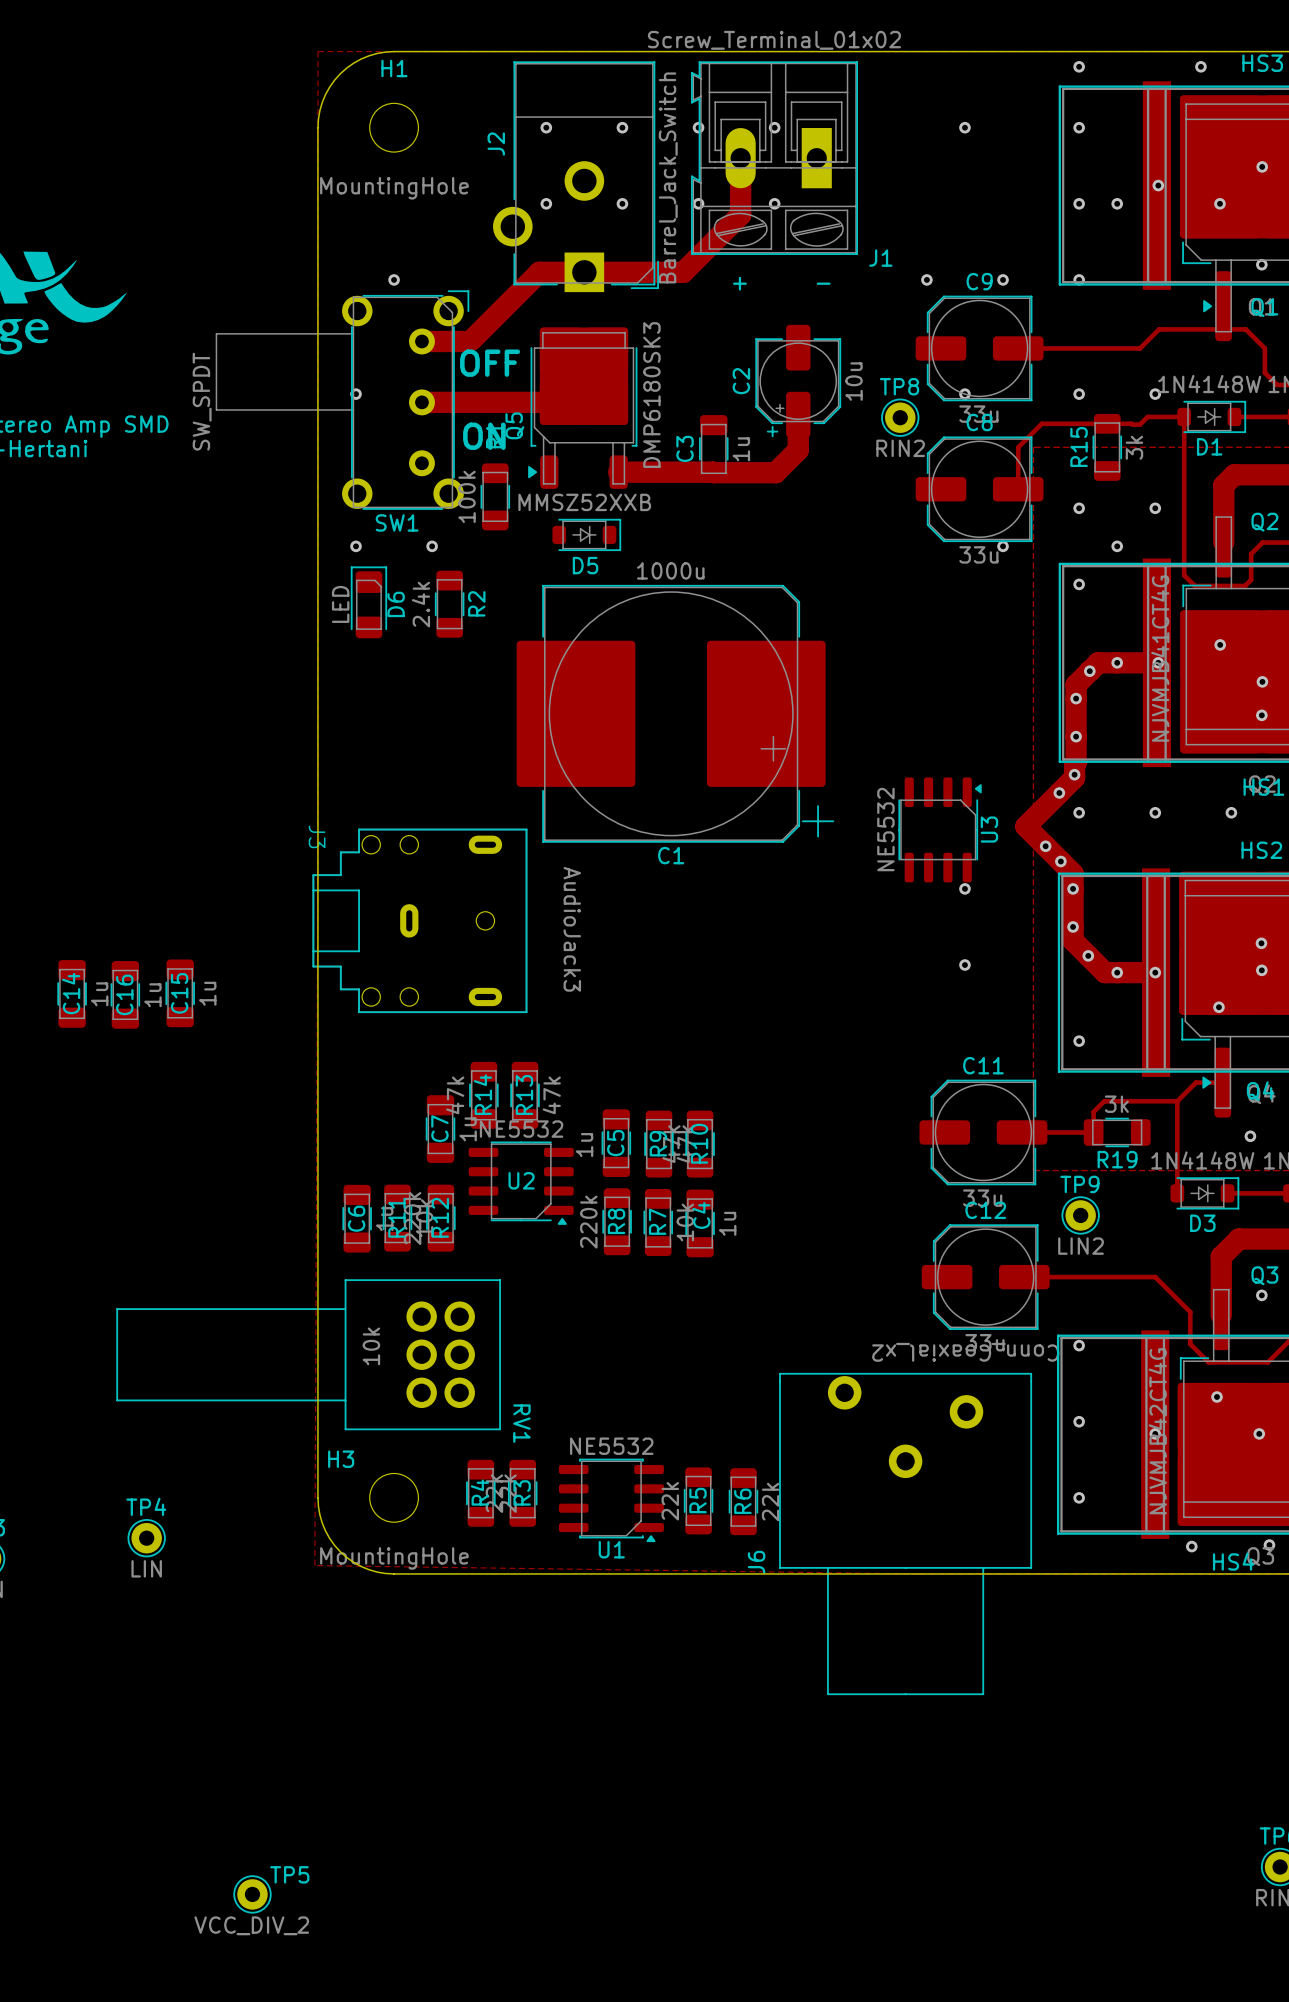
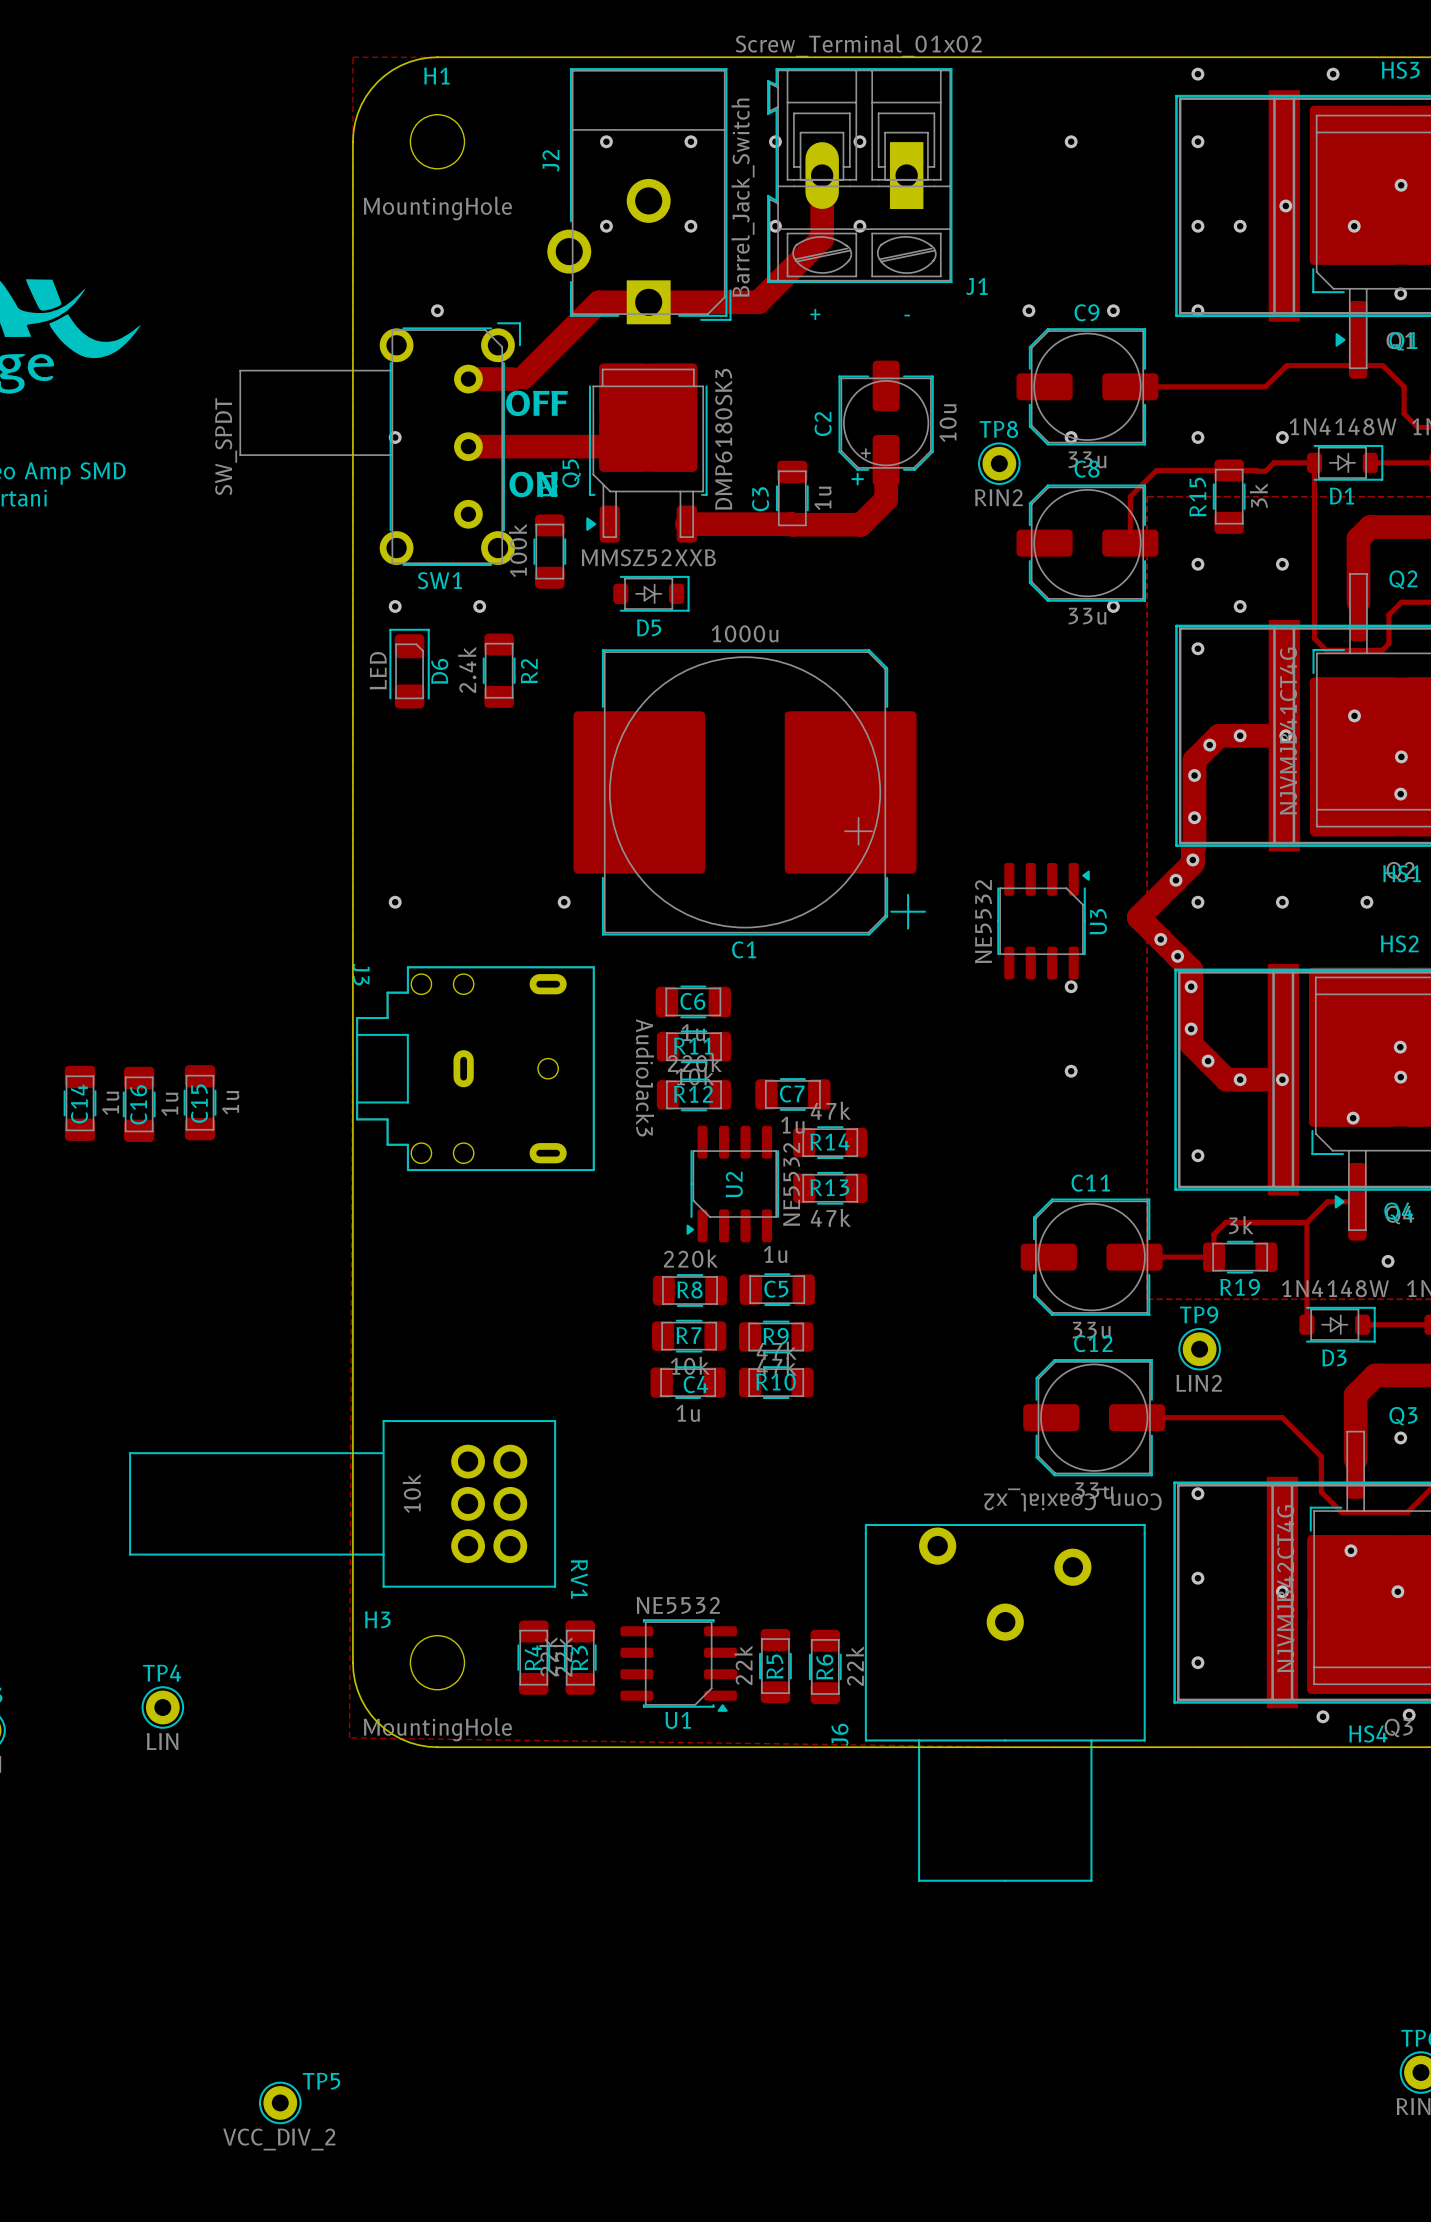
via: none -> (395, 902)
via: none -> (564, 902)
J3 position: (419, 920) -> (475, 1068)
R14 rotation: 0° (483, 1095) -> 90° clockwise (830, 1142)
R14 position: (483, 1095) -> (830, 1142)
R13 rotation: 0° (524, 1095) -> 90° clockwise (830, 1188)
R13 position: (524, 1095) -> (830, 1188)
C7 rotation: 0° (440, 1129) -> 90° clockwise (792, 1094)
C7 position: (440, 1129) -> (792, 1094)
C5 rotation: 0° (616, 1143) -> 90° clockwise (777, 1289)
C5 position: (616, 1143) -> (777, 1289)
R9 rotation: 0° (658, 1144) -> 90° clockwise (776, 1336)
R9 position: (658, 1144) -> (776, 1336)
R10 rotation: 0° (700, 1144) -> 90° clockwise (776, 1382)
R10 position: (700, 1144) -> (776, 1382)
U2 rotation: 0° (521, 1183) -> 90° clockwise (732, 1184)
U2 position: (521, 1183) -> (732, 1184)
C6 rotation: 0° (357, 1218) -> 90° clockwise (693, 1001)
C6 position: (357, 1218) -> (693, 1001)
R11 rotation: 0° (397, 1218) -> 90° clockwise (693, 1046)
R11 position: (397, 1218) -> (693, 1046)
R12 rotation: 0° (440, 1218) -> 90° clockwise (693, 1094)
R12 position: (440, 1218) -> (693, 1094)
R8 rotation: 0° (617, 1221) -> 90° clockwise (690, 1290)
R8 position: (617, 1221) -> (690, 1290)
R7 rotation: 0° (658, 1222) -> 90° clockwise (689, 1336)
R7 position: (658, 1222) -> (689, 1336)
C4 rotation: 0° (700, 1223) -> 90° clockwise (688, 1382)
C4 position: (700, 1223) -> (688, 1382)

